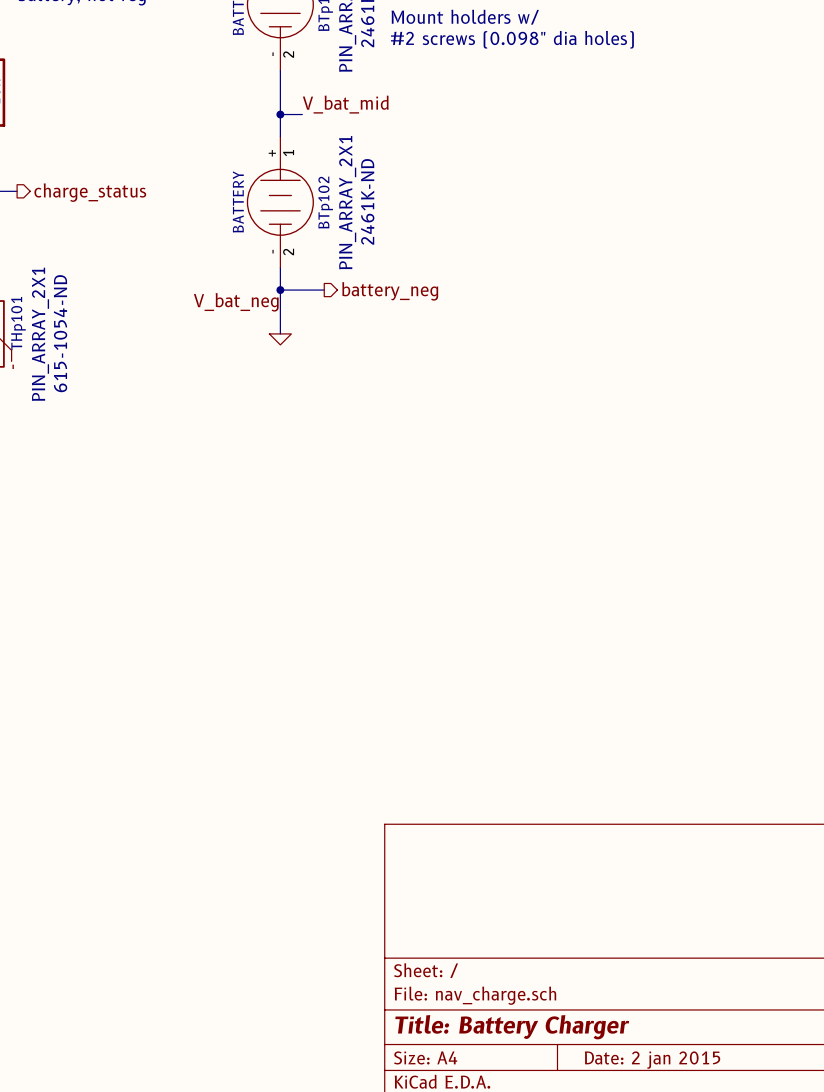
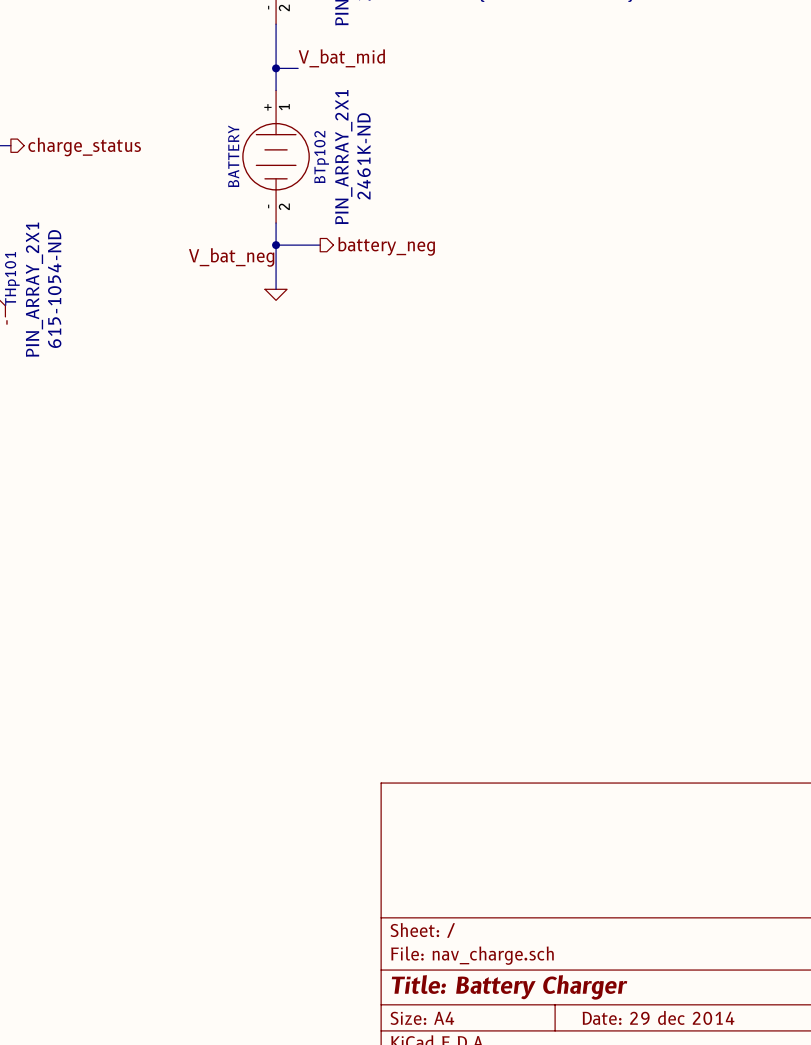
title block: Date: 2 jan 2015 (652, 1060) -> Date: 29 dec 2014 (658, 1017)

